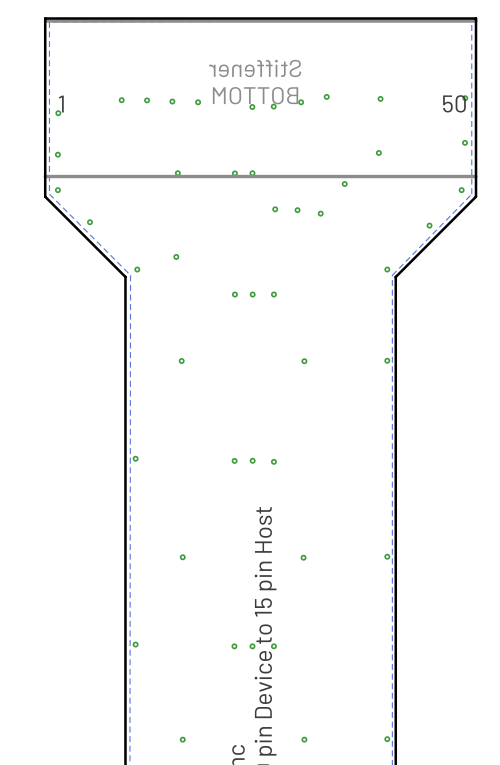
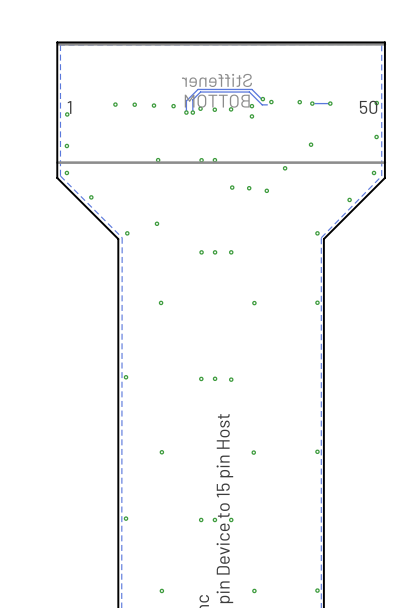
track: none -> (262, 99) (251, 89) (197, 89) (186, 101) (186, 112)
via: none -> (262, 99)
via: none -> (299, 102)
track: none -> (330, 103) (314, 103)
via: none -> (330, 103)
track: none -> (267, 104) (262, 104) (249, 92) (200, 92) (192, 99) (192, 112)
via: none -> (200, 108)
via: none -> (186, 112)
via: none -> (192, 112)
via: none -> (251, 116)

